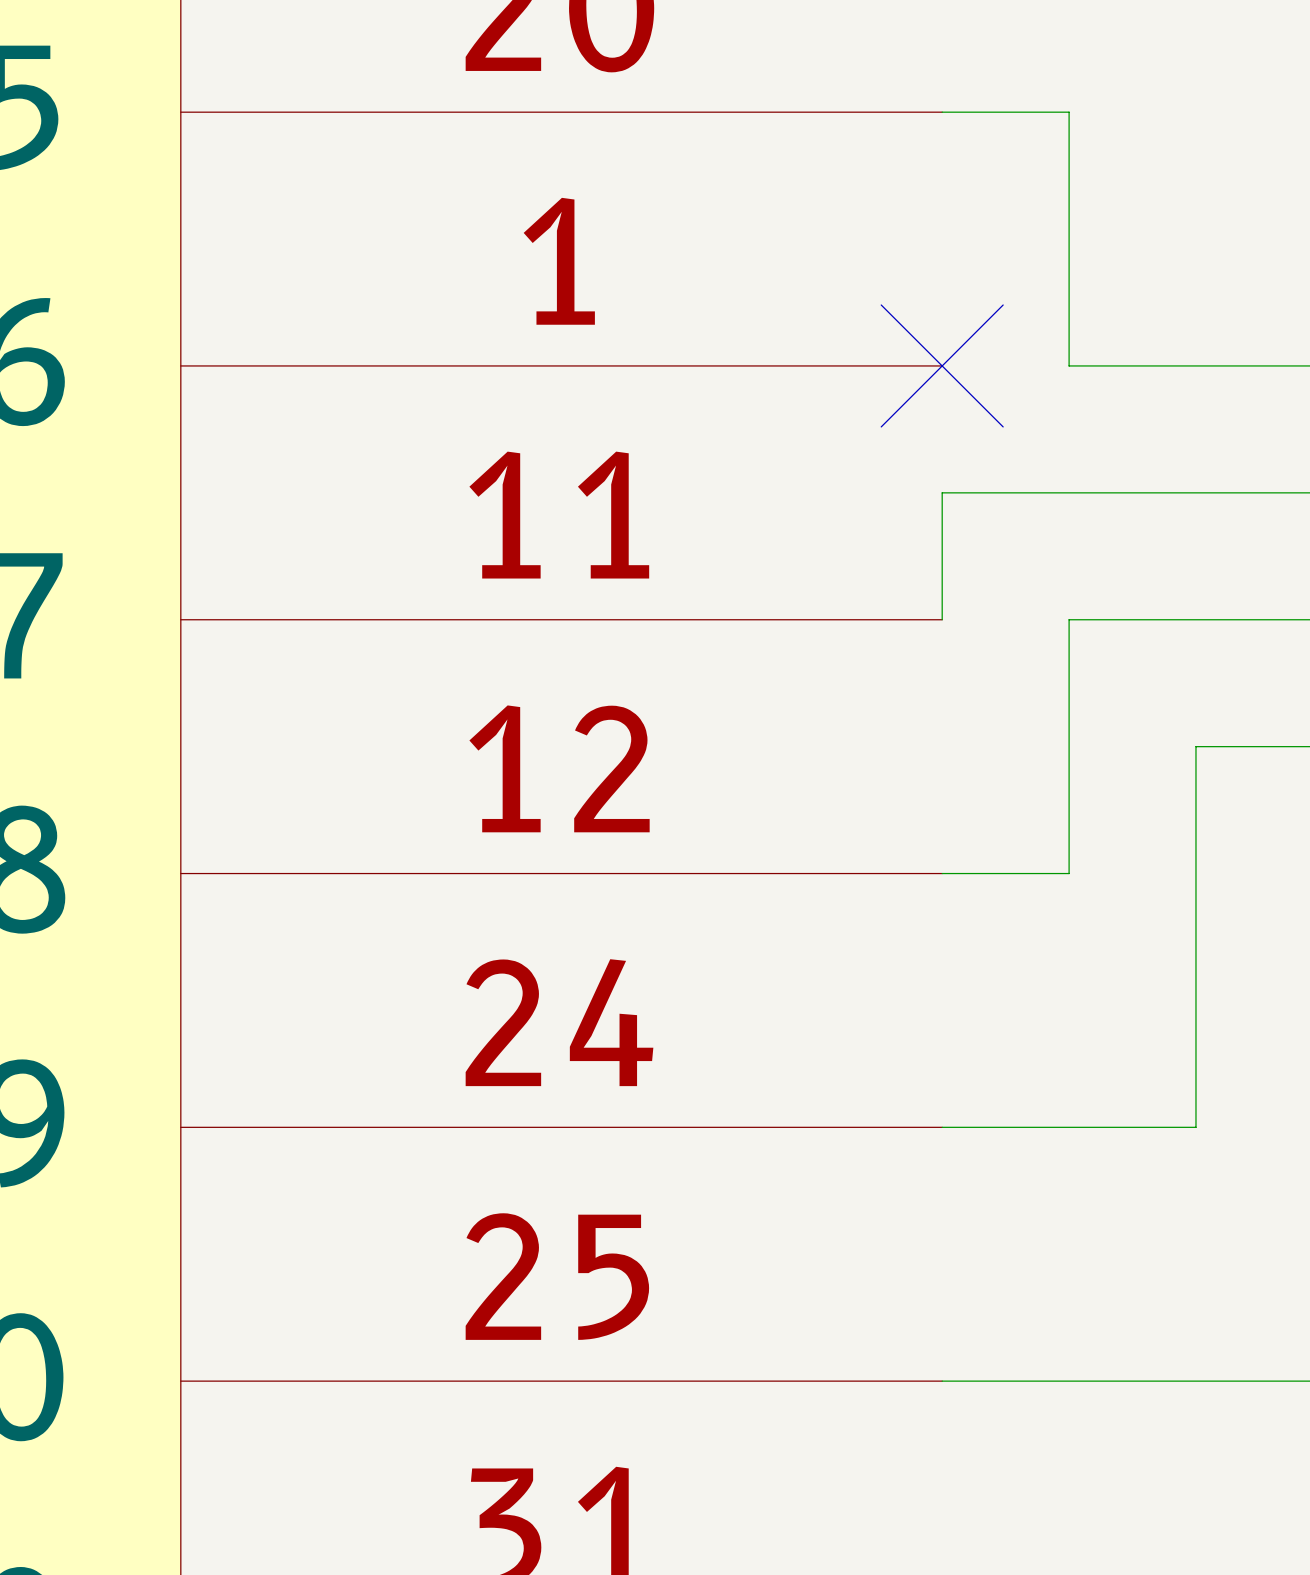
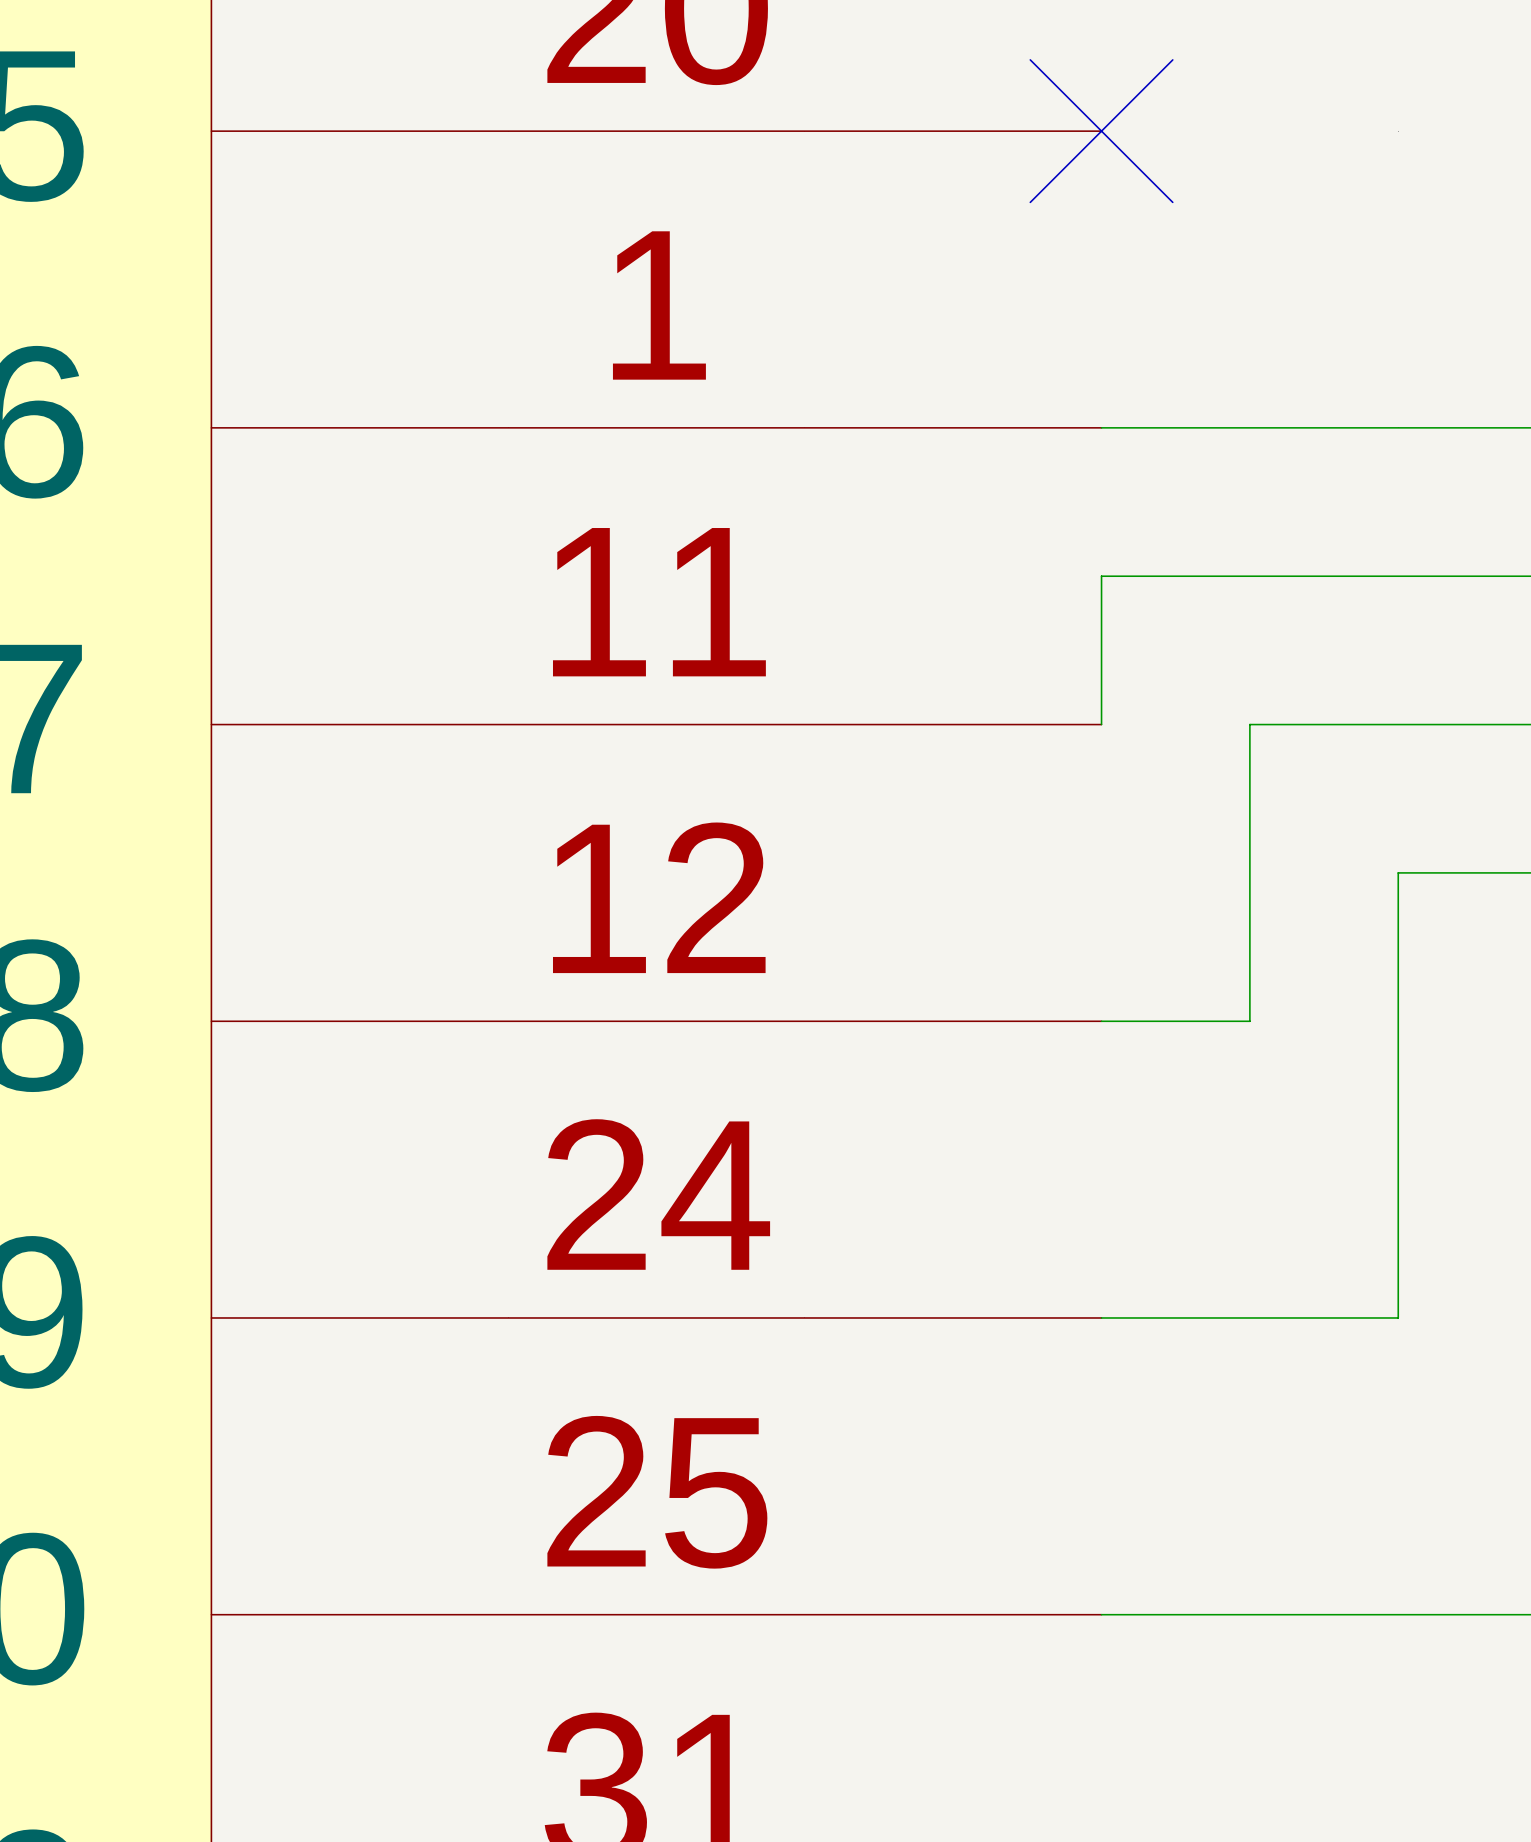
wire: (942, 112) (1069, 112) (1069, 365) -> (1101, 427) (1249, 427)
no-connect mark position: (942, 365) -> (1101, 131)

